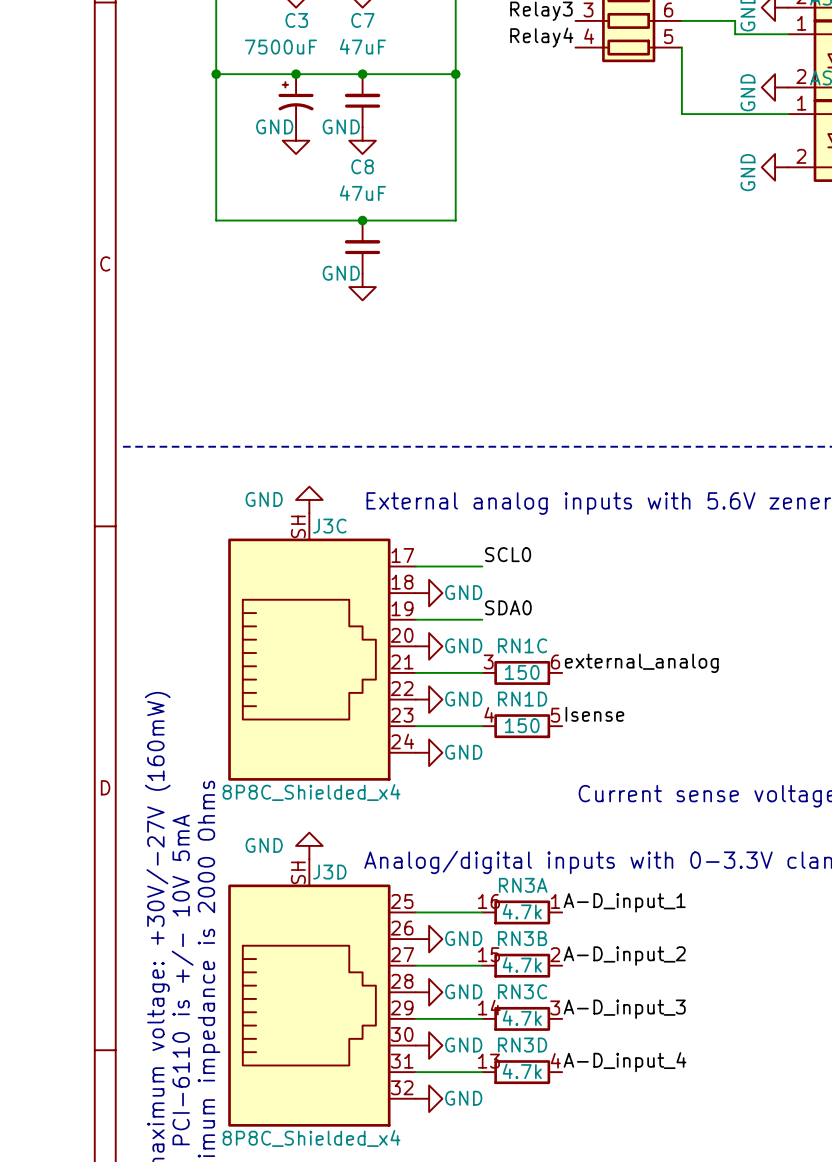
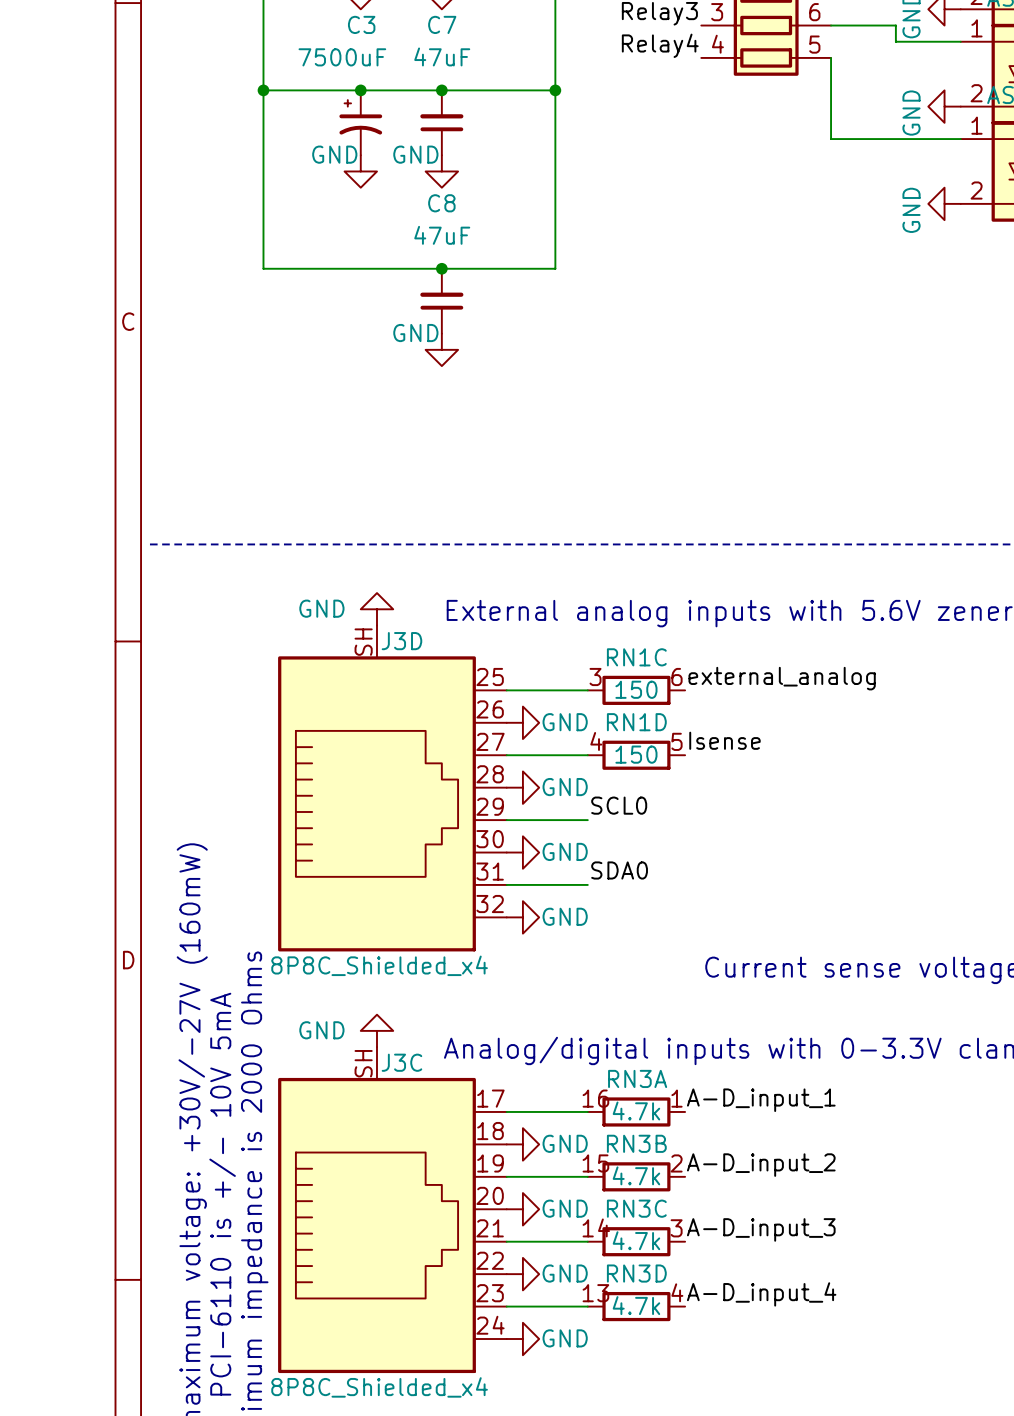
label position: SCL0 (508, 554) -> SCL0 (619, 805)
label position: SDA0 (508, 607) -> SDA0 (619, 870)
J3C position: (321, 647) -> (392, 1210)
label position: external_analog (641, 663) -> external_analog (782, 678)
RN1C position: (522, 672) -> (636, 690)
label position: Isense (594, 714) -> Isense (724, 740)
RN1D position: (522, 726) -> (636, 755)
J3D position: (321, 992) -> (392, 788)

